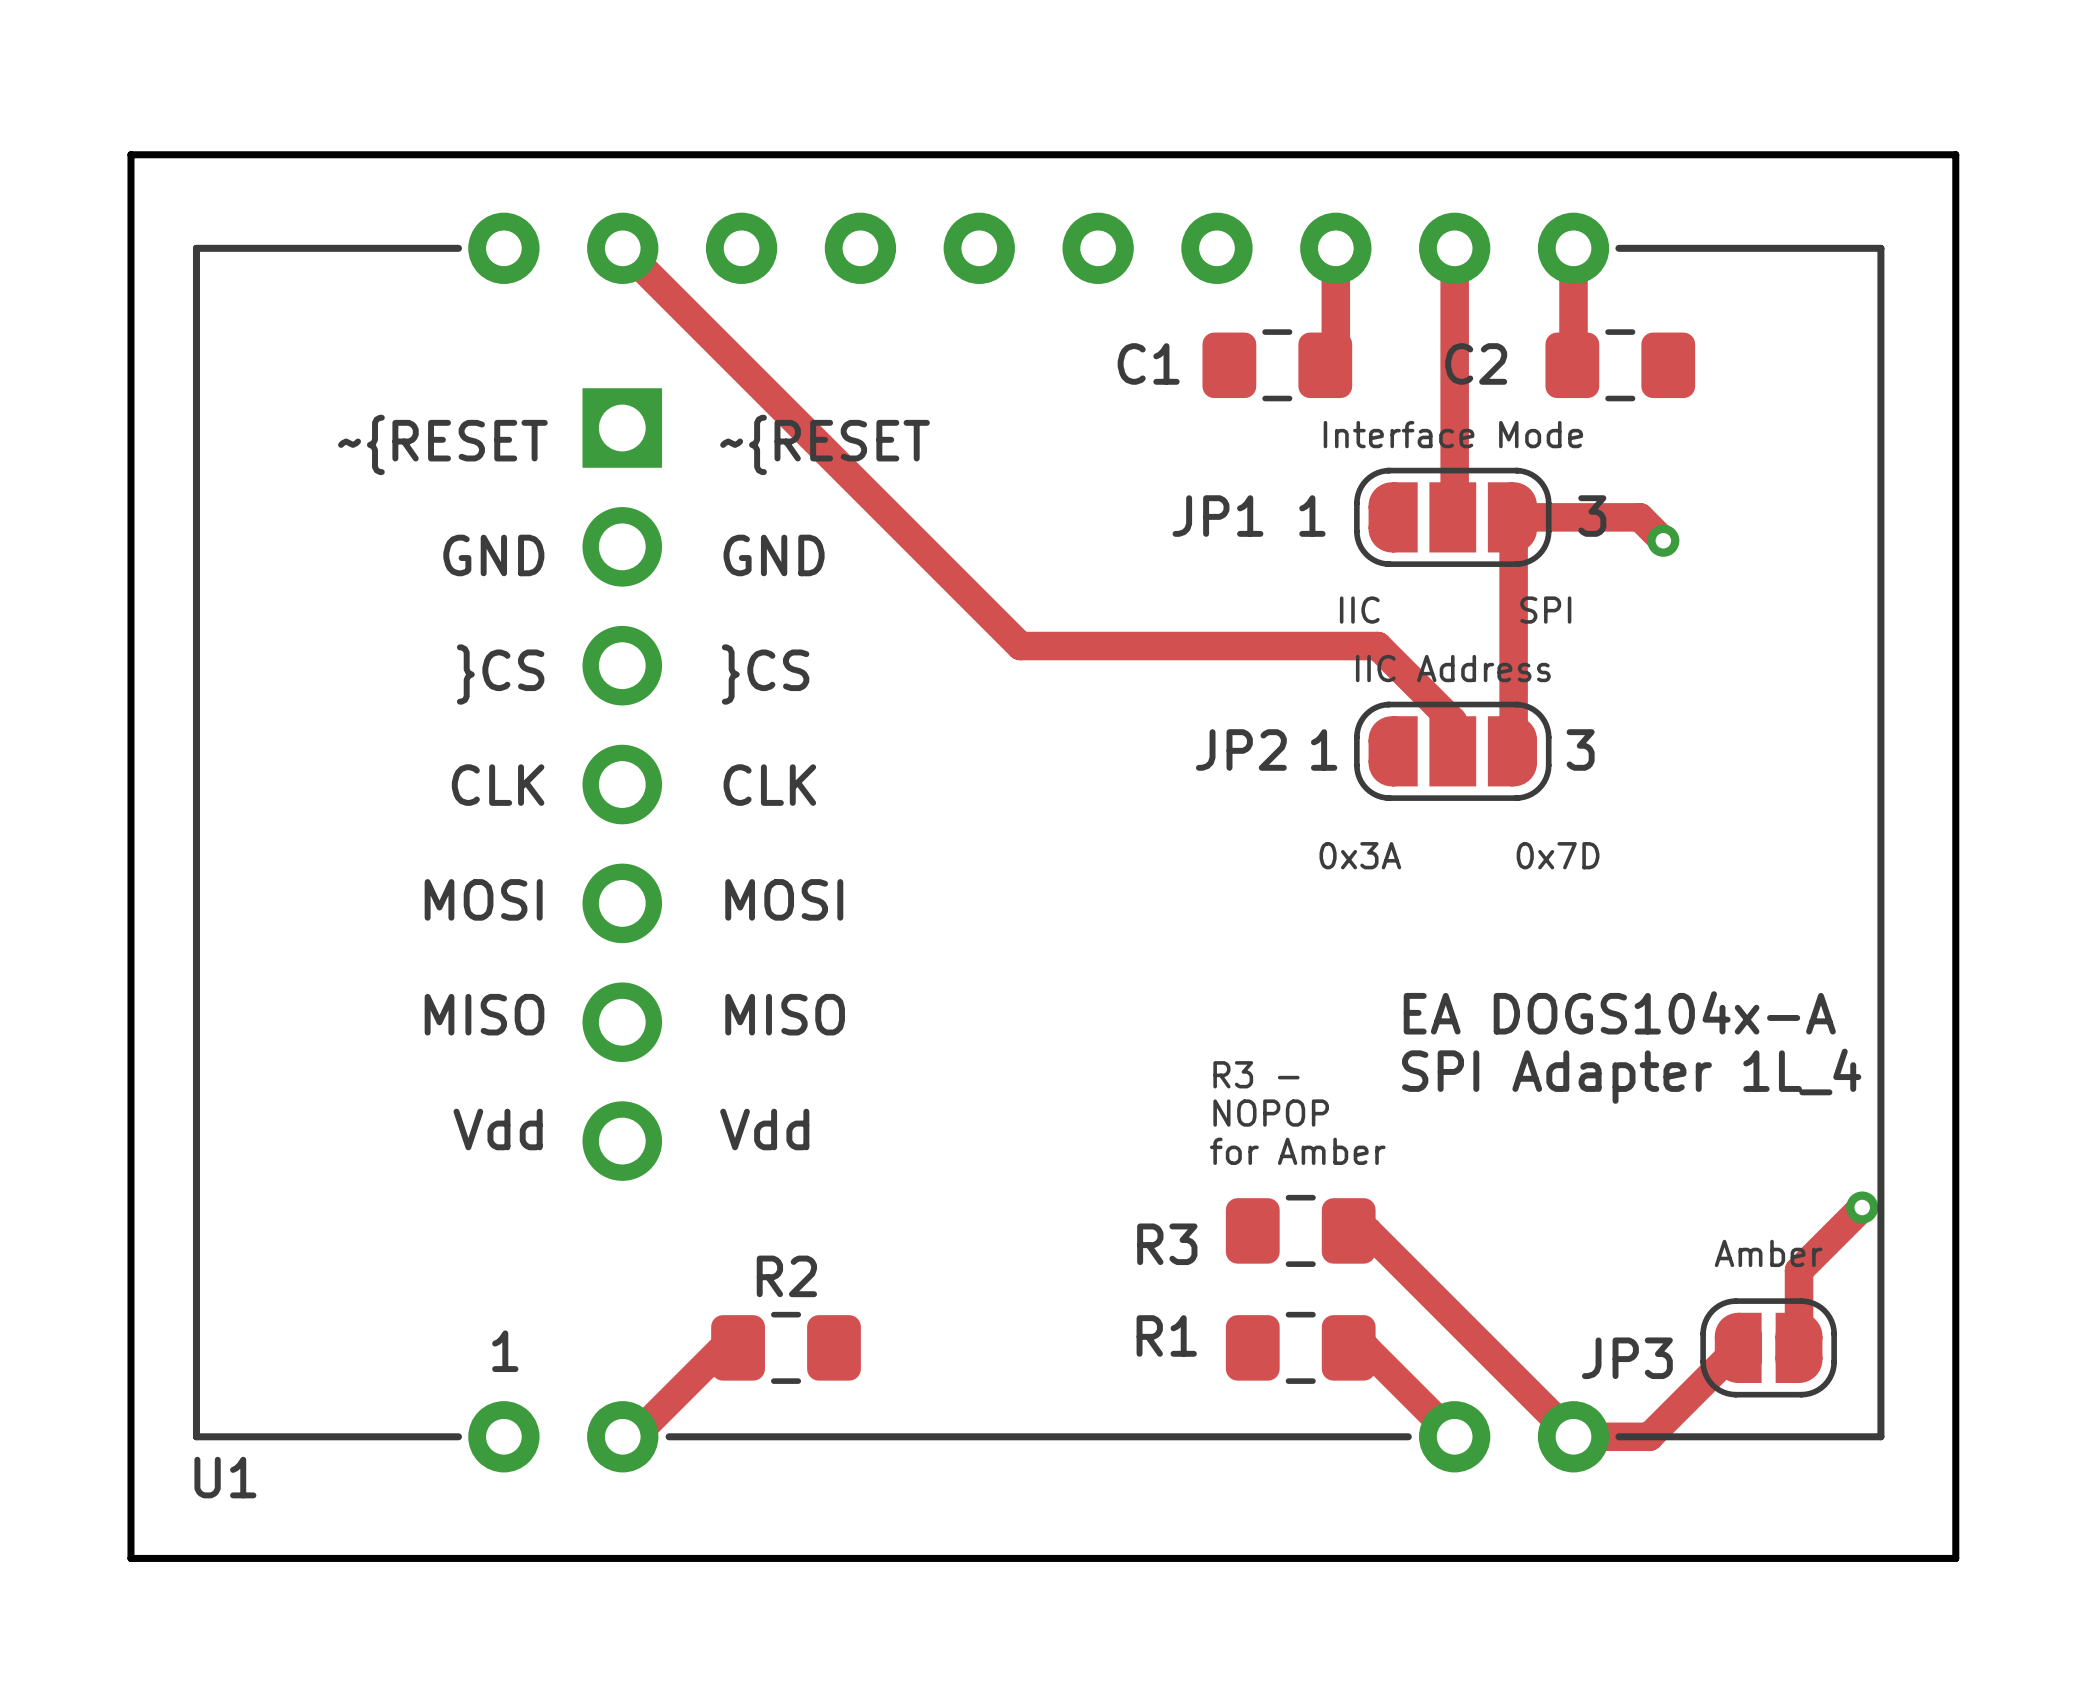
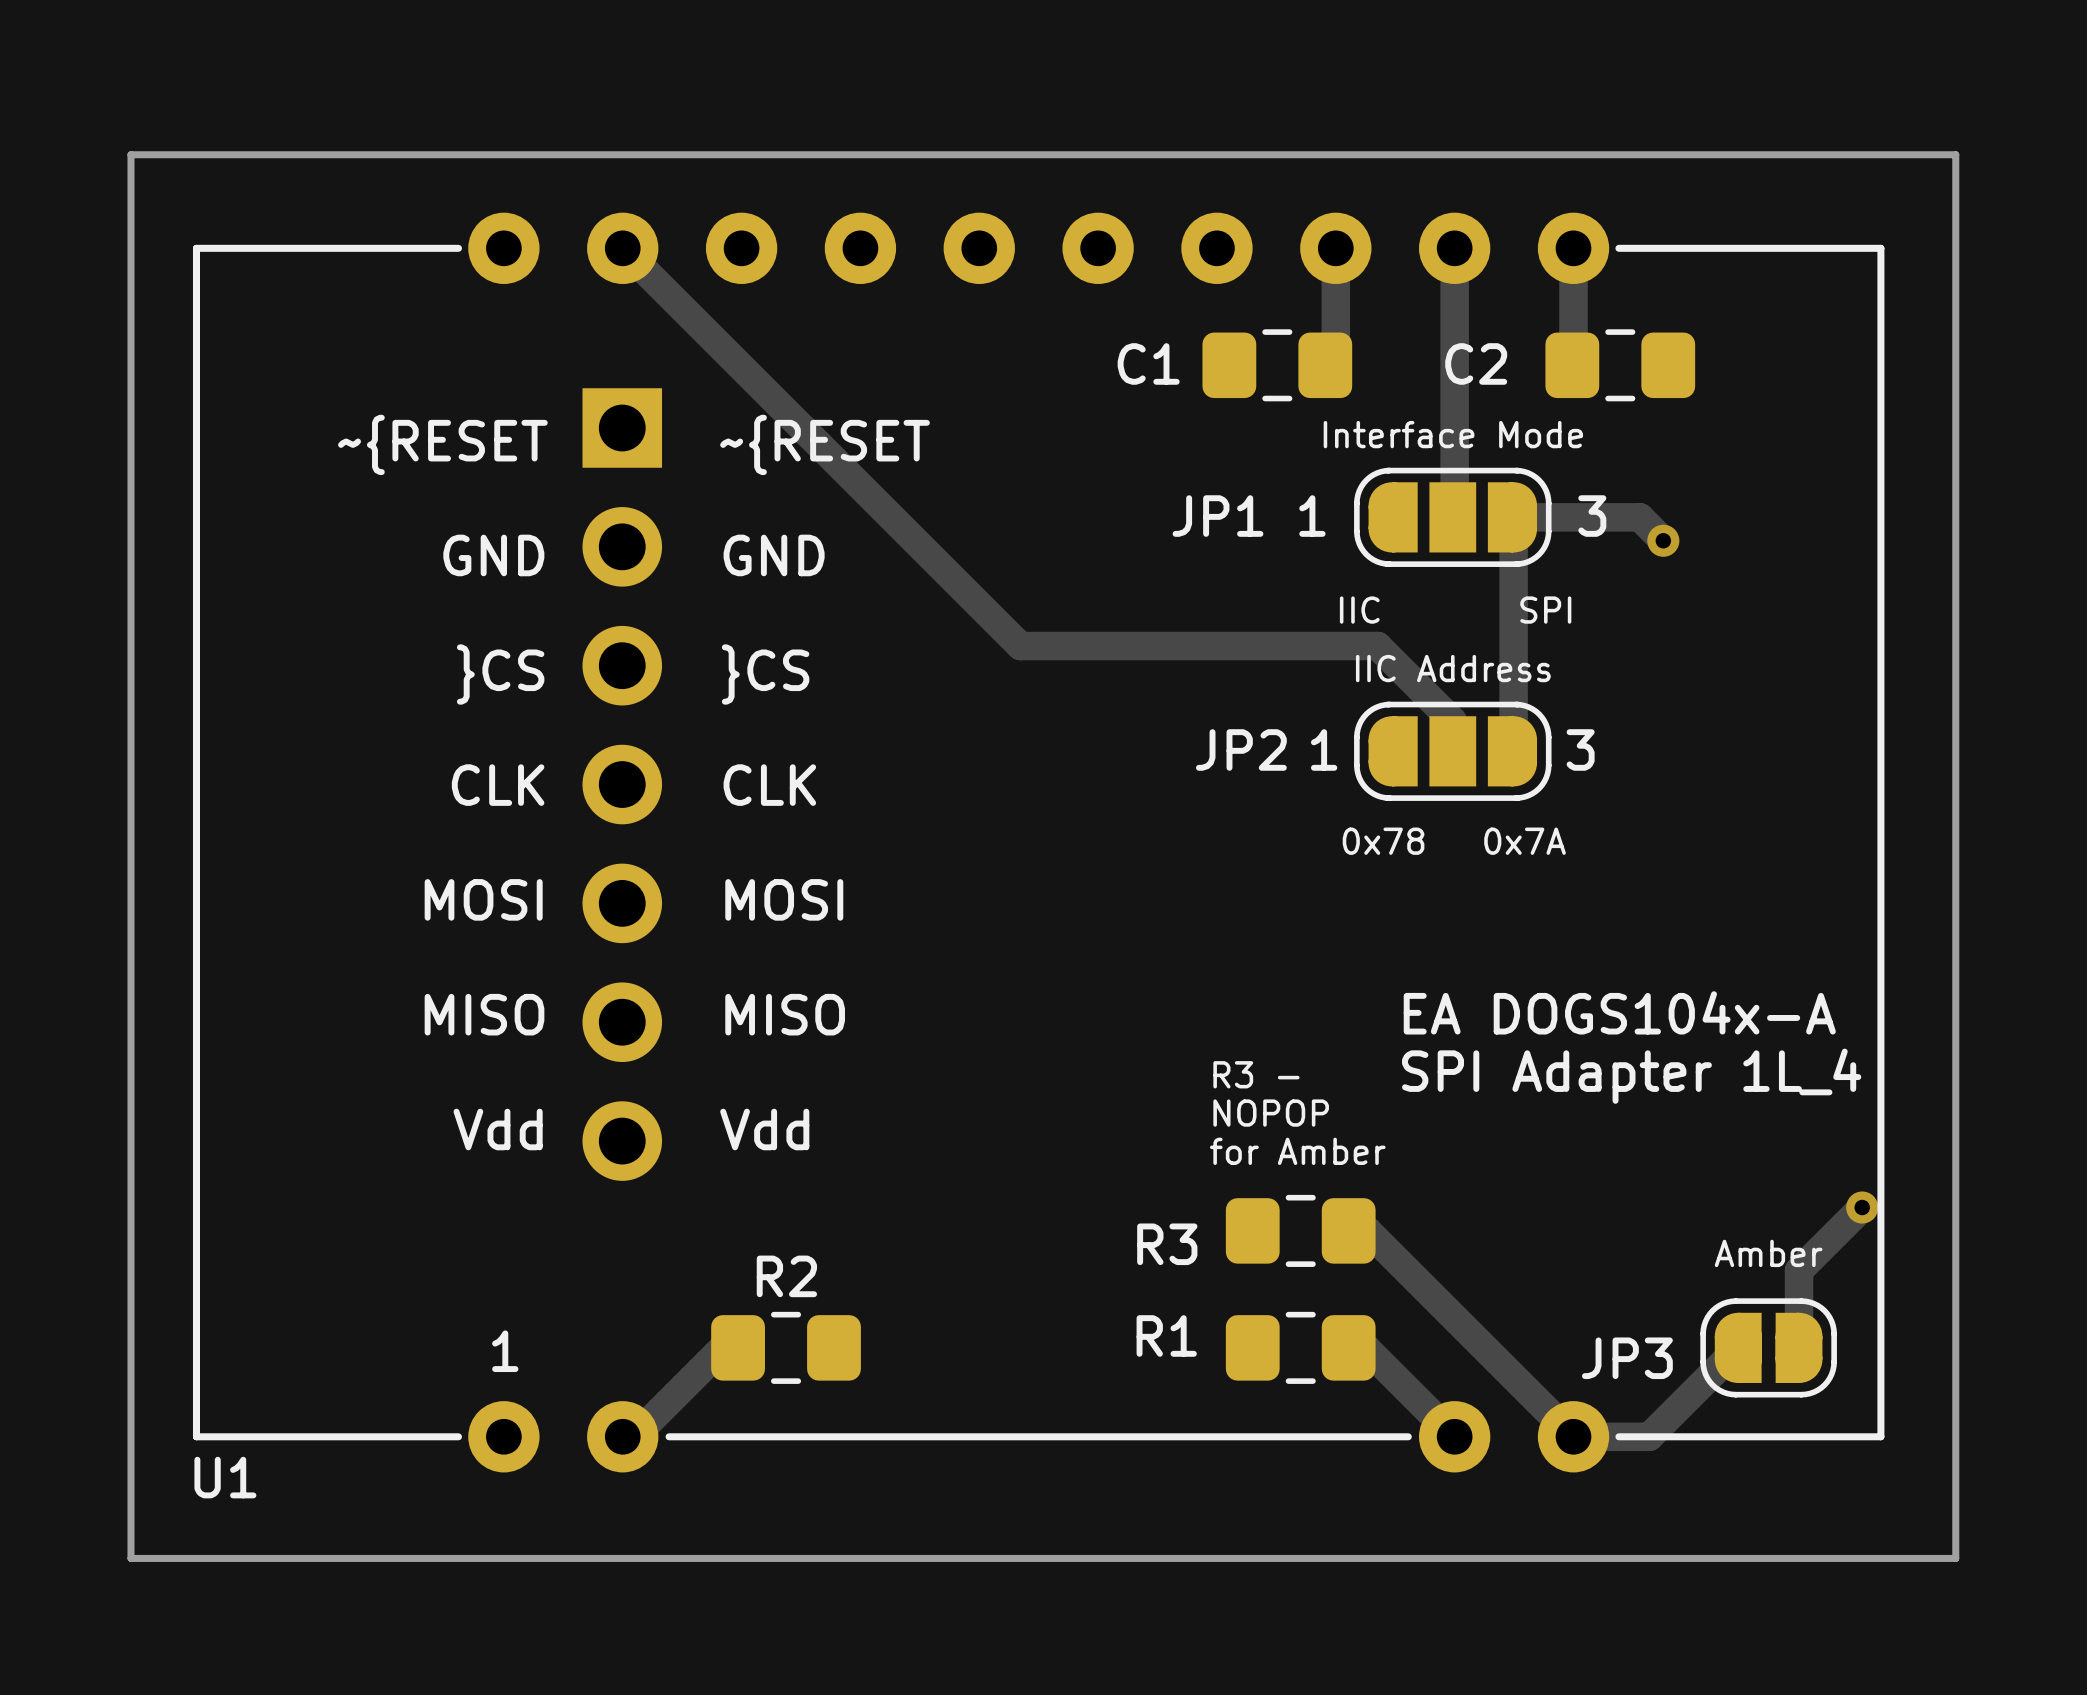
text: 0x3A (1360, 855) -> 0x78 (1383, 841)
text: 0x7D (1558, 855) -> 0x7A (1525, 841)

